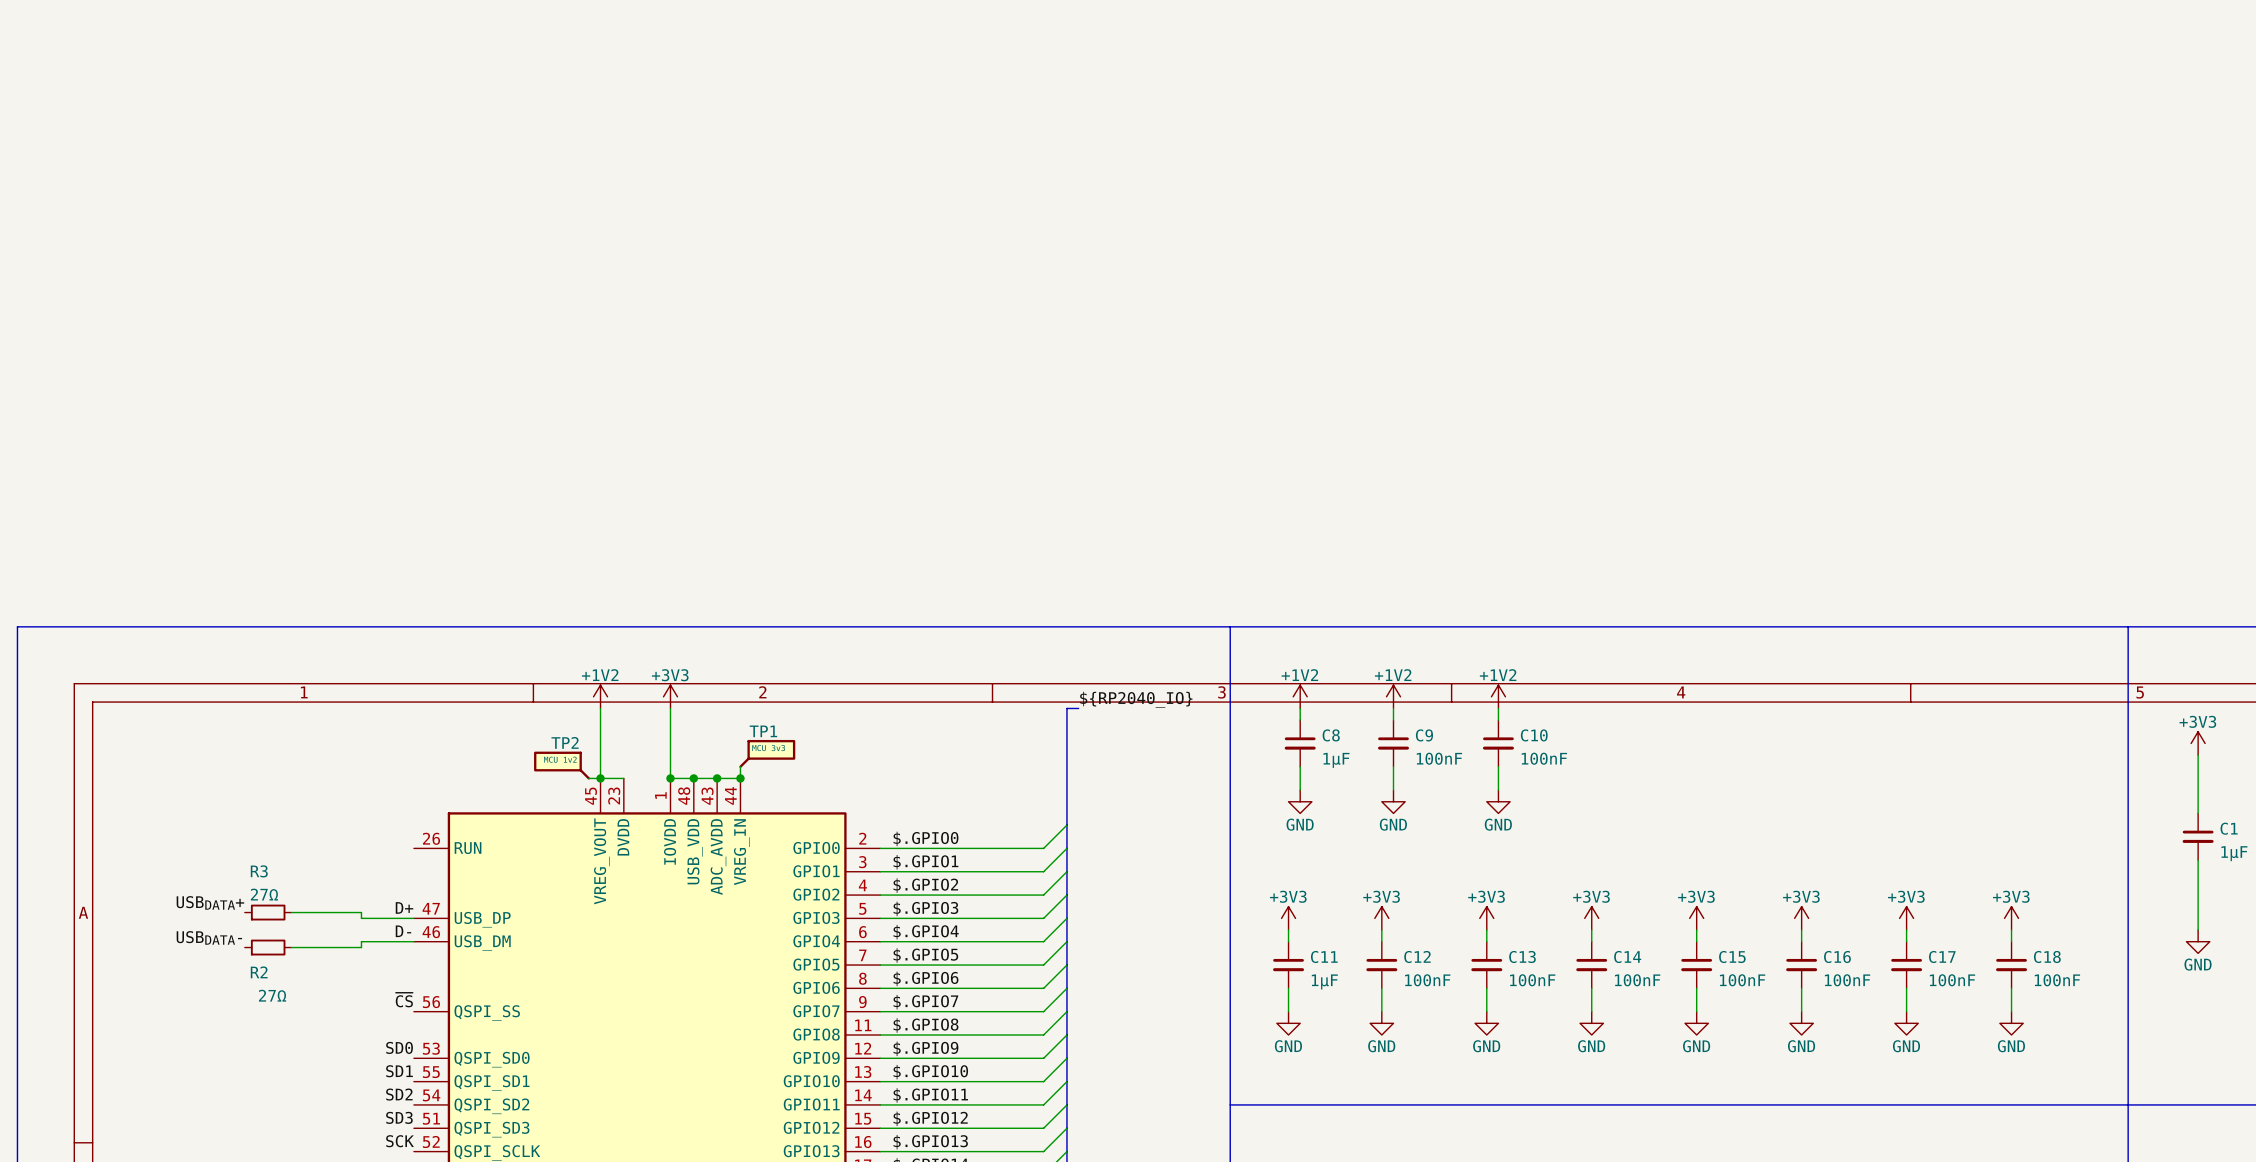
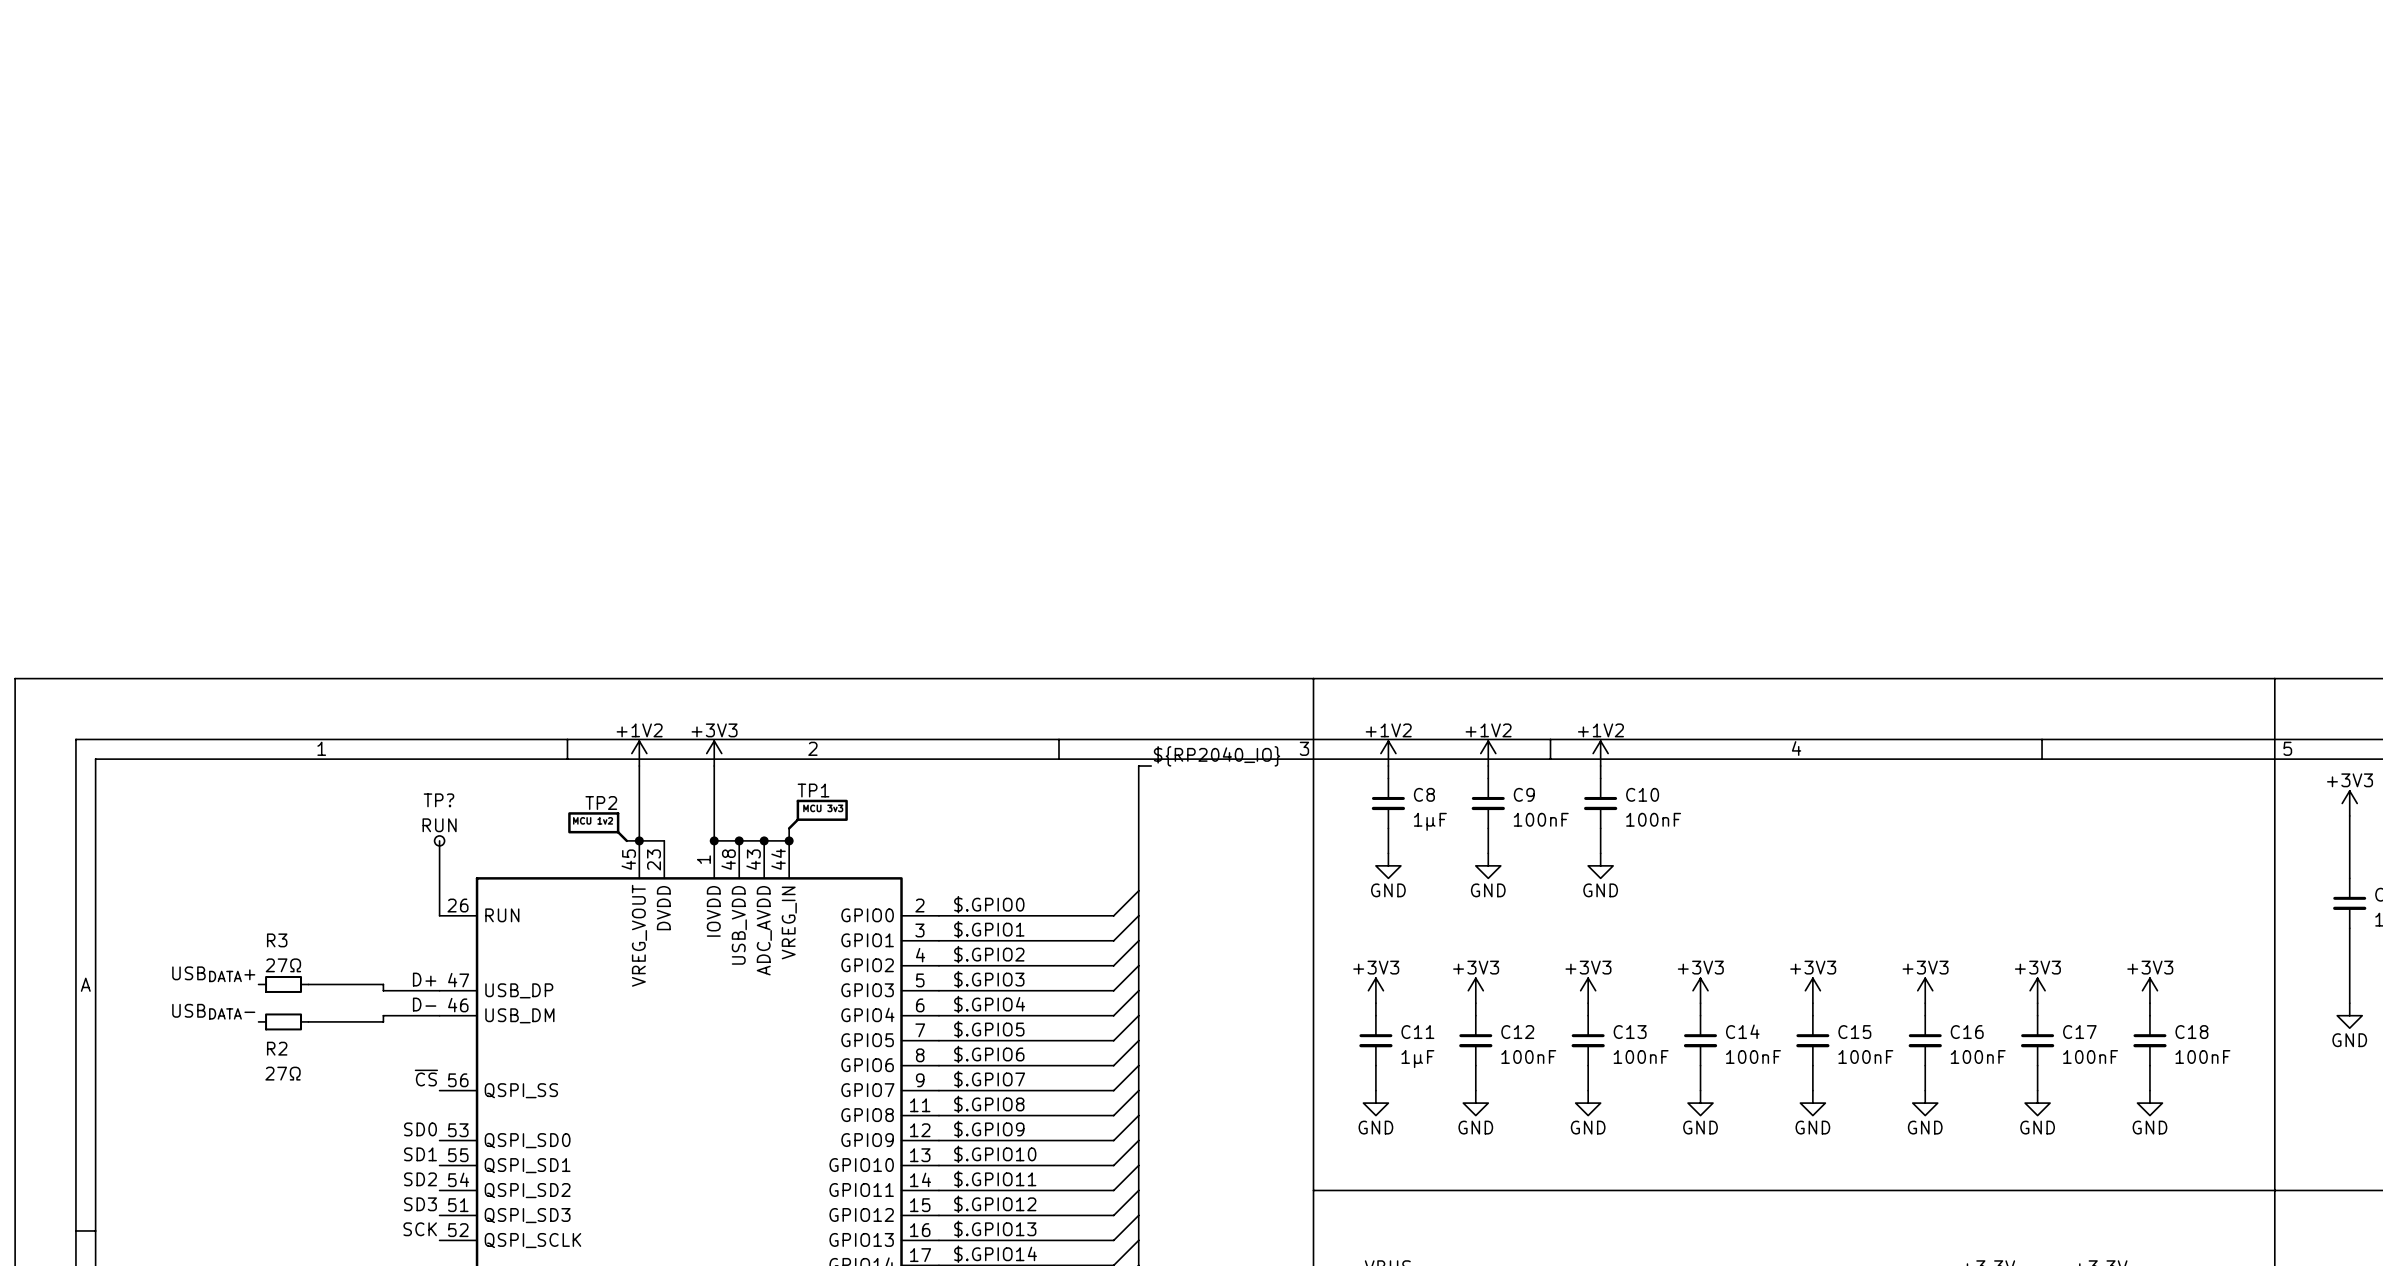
wire: none -> (439, 840) (439, 915)
TP?: none -> RUN (439, 840)

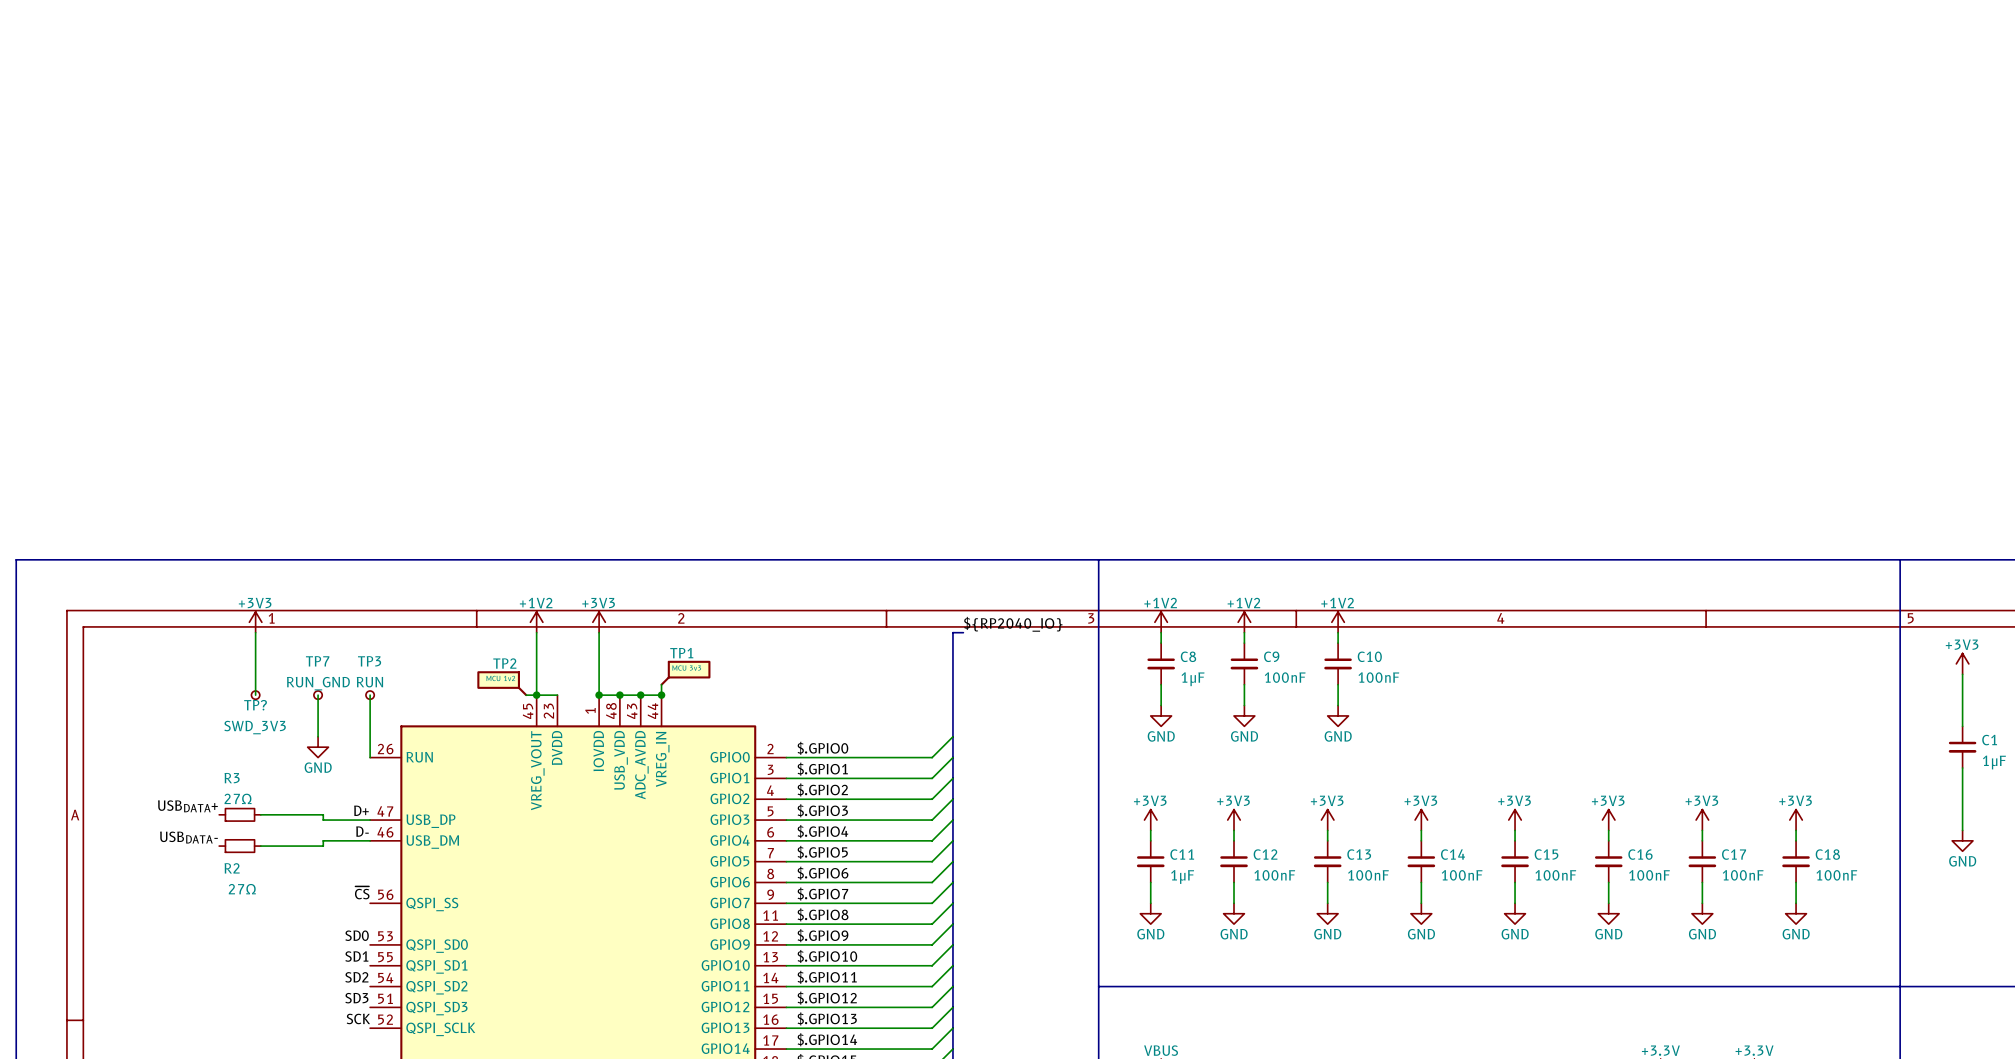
power symbol: none -> +3V3 (255, 622)
wire: none -> (255, 632) (255, 695)
TP? name: TP? (438, 800) -> TP3 (369, 661)
TP?: none -> SWD_3V3 (255, 695)
wire: none -> (318, 695) (318, 736)
TP7: none -> RUN_GND (318, 695)
power symbol: none -> GND (318, 747)

